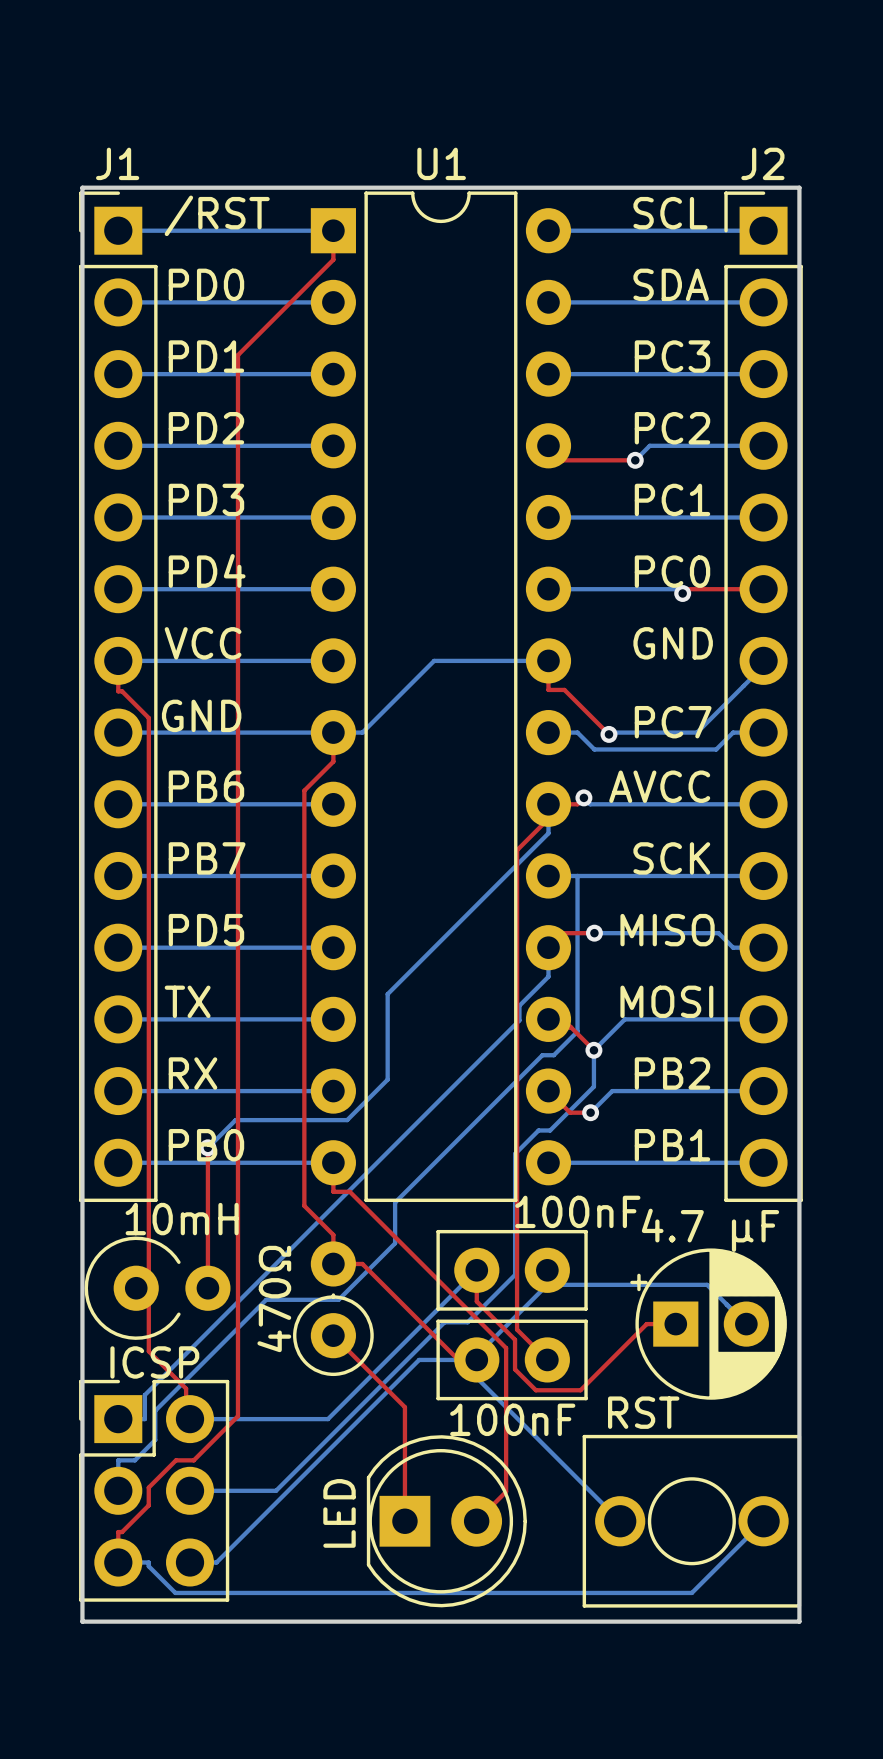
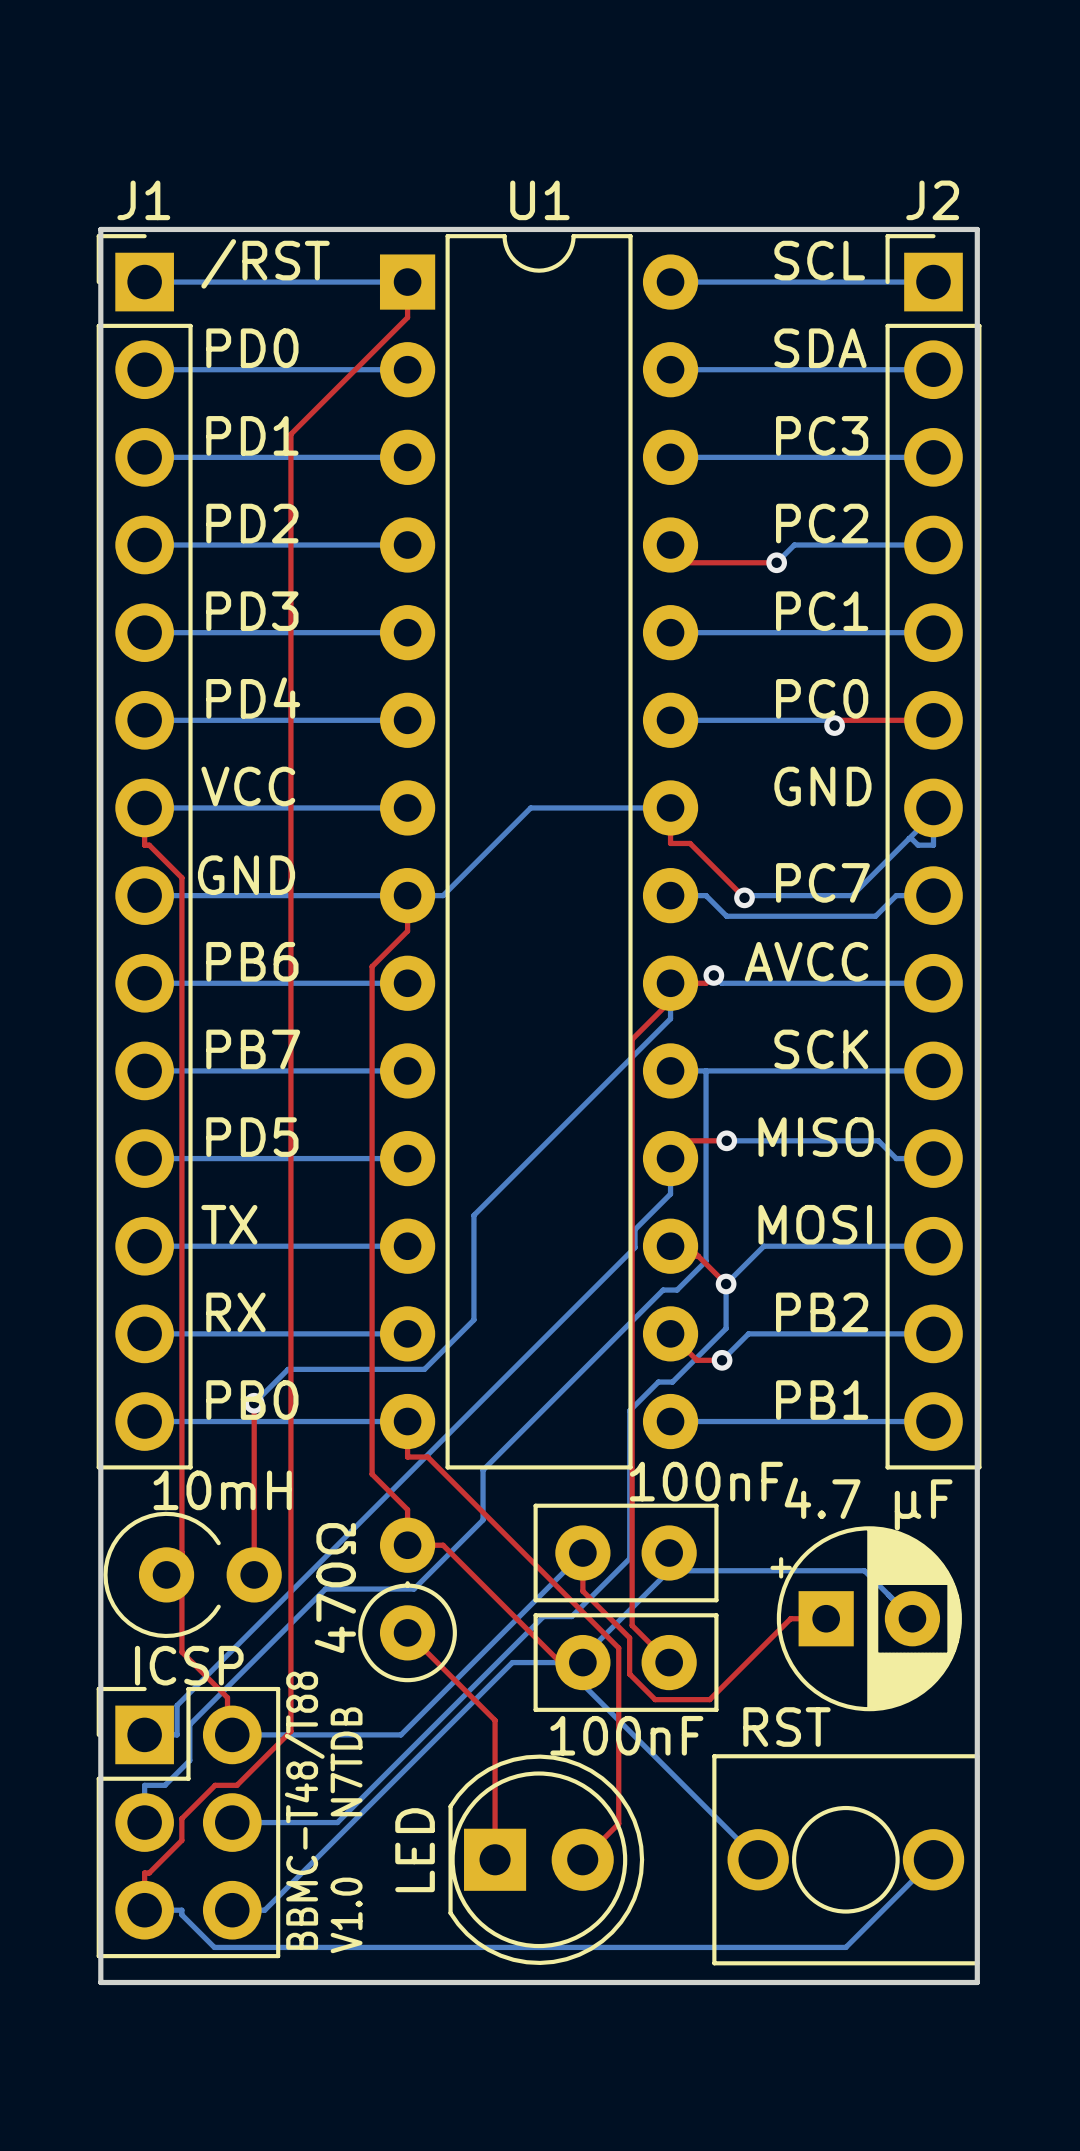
bottom track: none -> (933, 807) (933, 845) (918, 845) (909, 838)
text: none -> BBMC-T48/T88 (304, 1810)
text: none -> V1.0 N7TDB (346, 1830)

